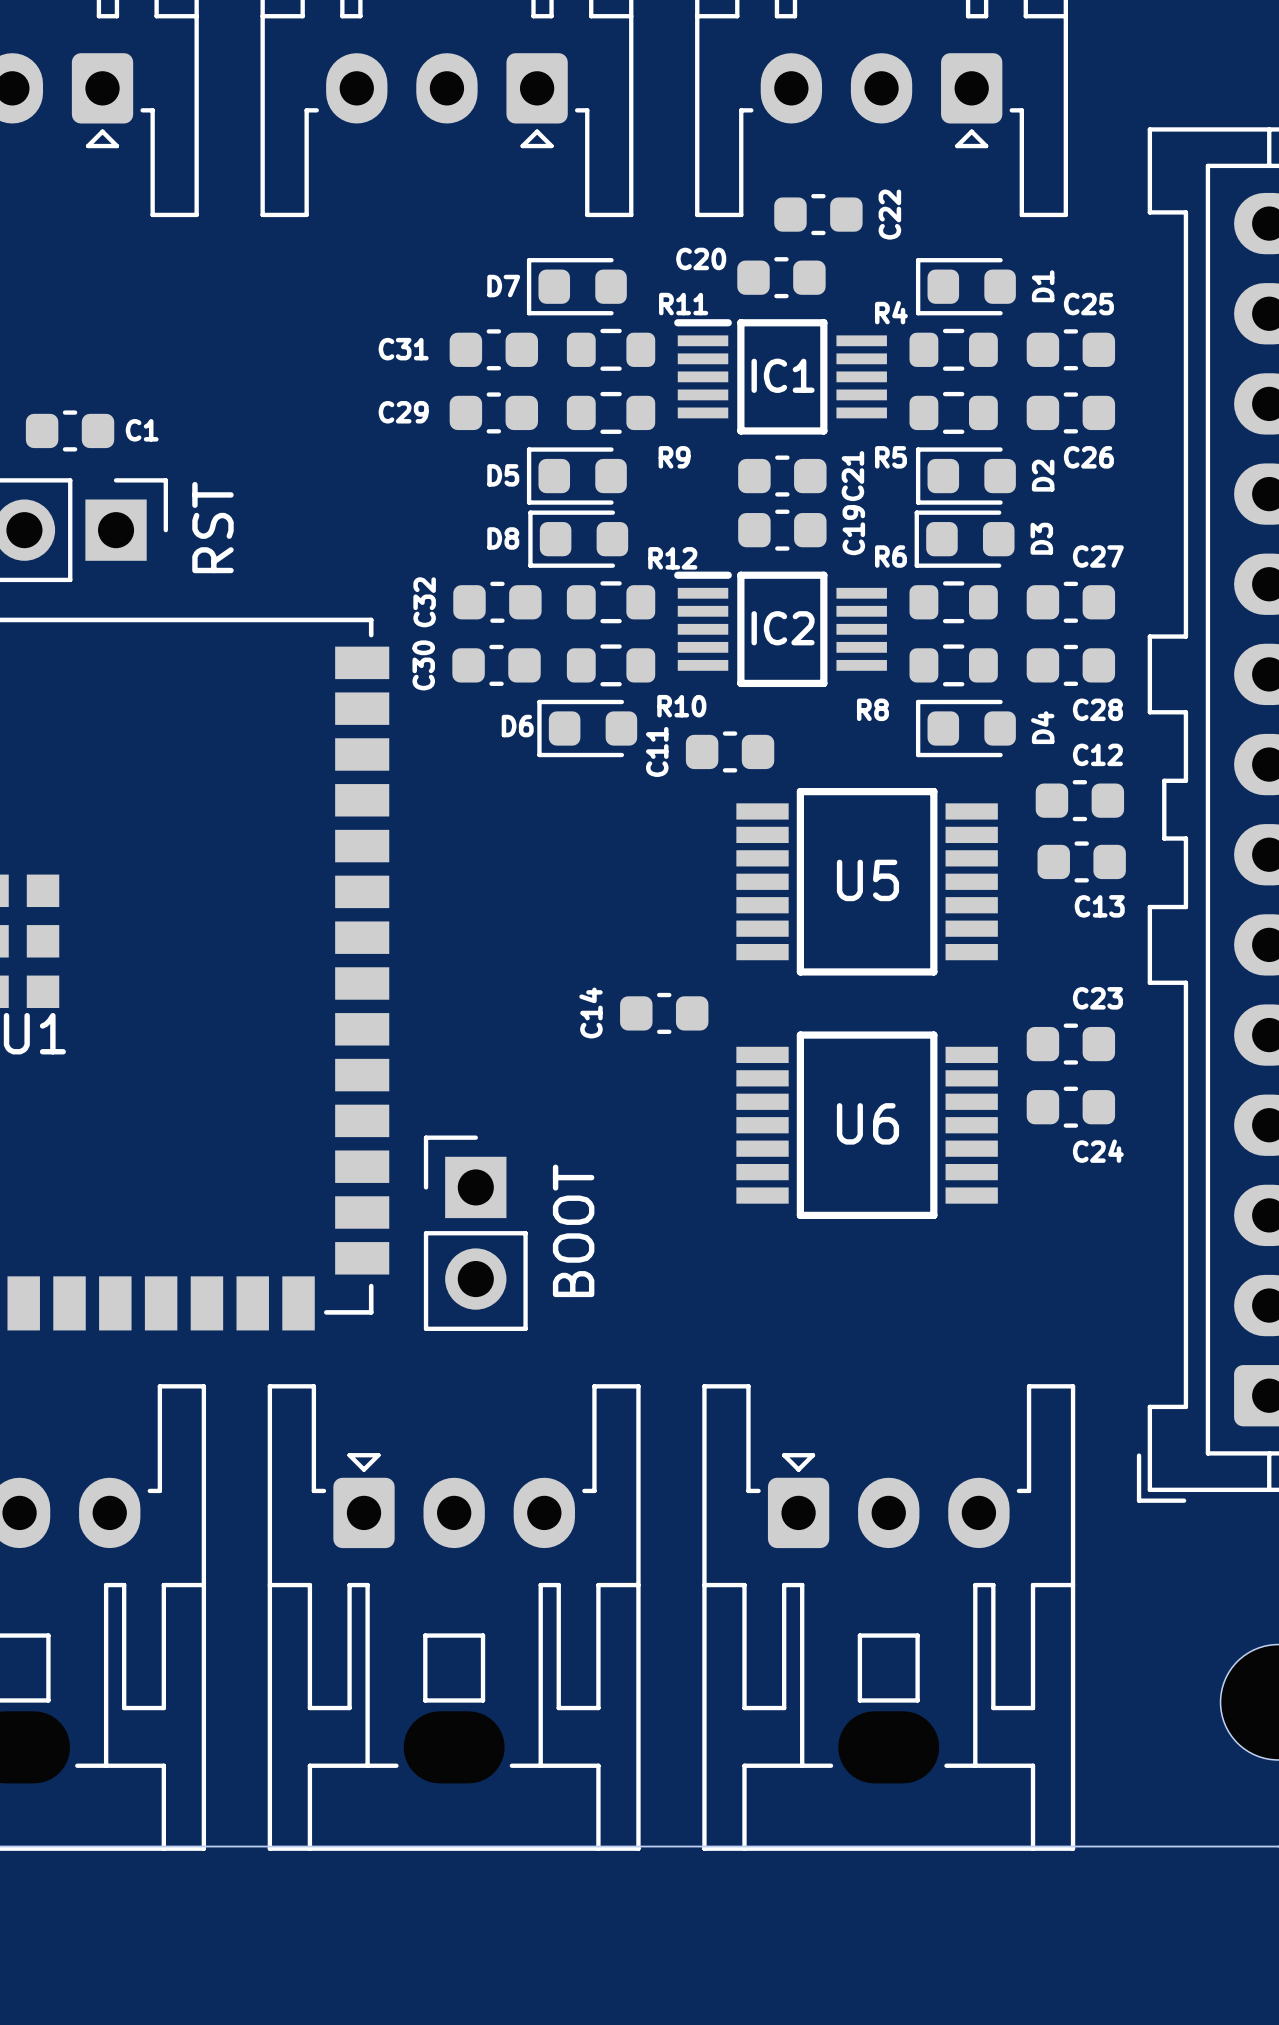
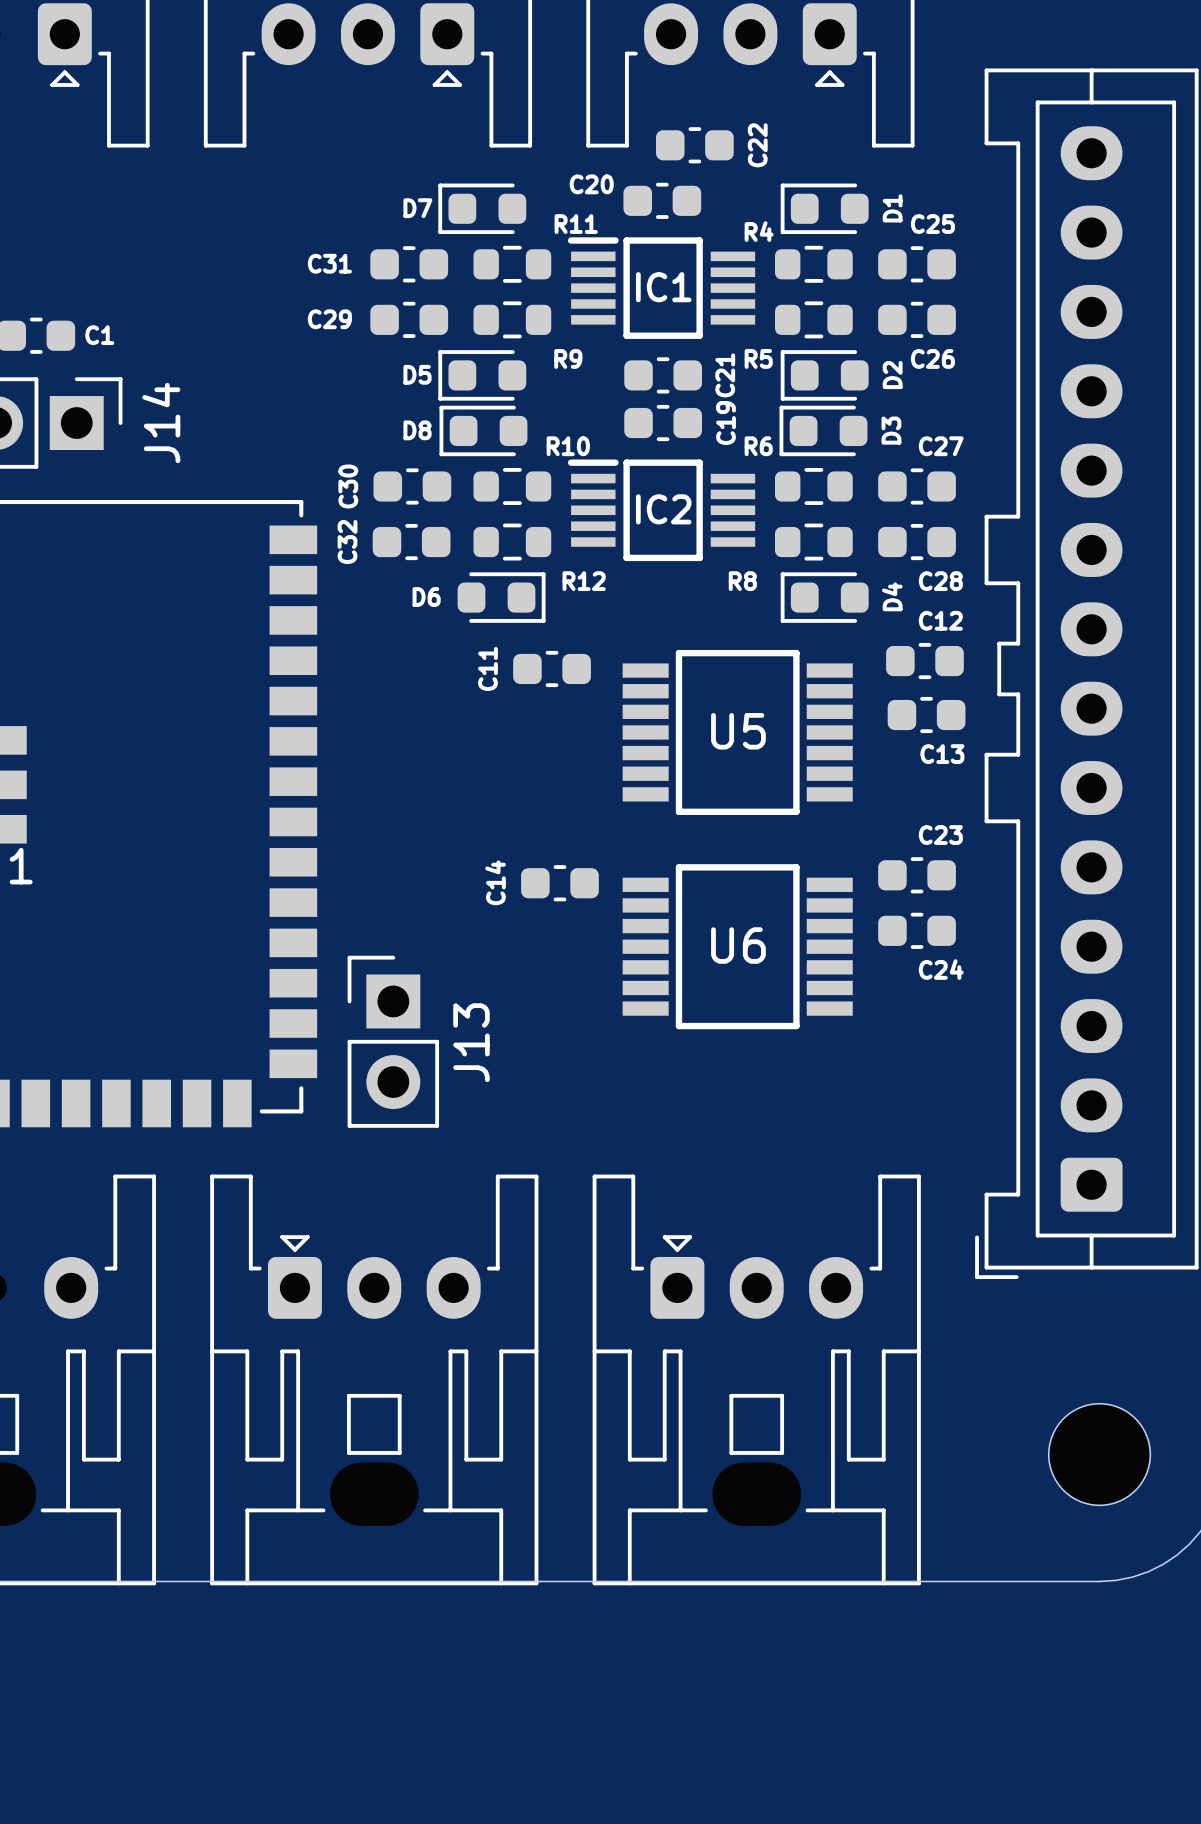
text: RST (212, 527) -> none
J14 name: none -> J14 (161, 423)
R12 name: R12 (672, 558) -> R10 (568, 446)
C32 name: C32 (424, 602) -> C30 (348, 486)
C30 name: C30 (423, 665) -> C32 (347, 542)
R10 name: R10 (681, 706) -> R12 (584, 581)
D6 rotation: 0° (587, 728) -> 180° (501, 597)
C11 position: (730, 751) -> (552, 668)
C14 position: (664, 1013) -> (559, 883)
text: BOOT (573, 1230) -> none
J13 name: none -> J13 (471, 1042)

